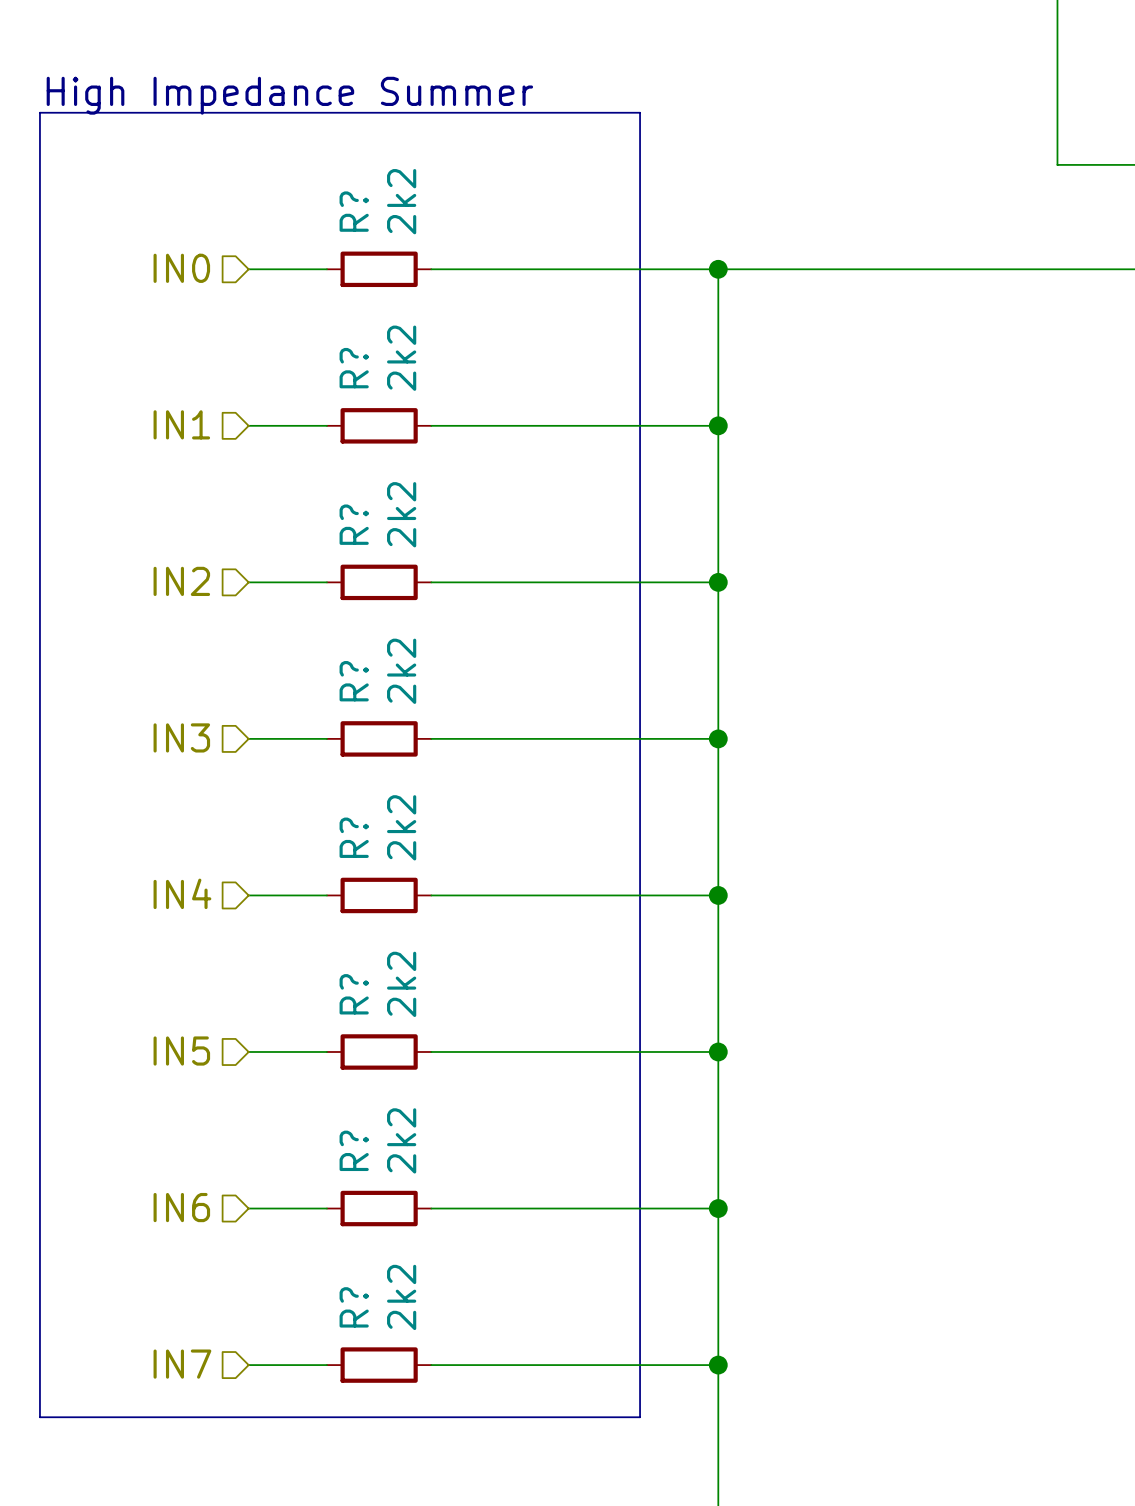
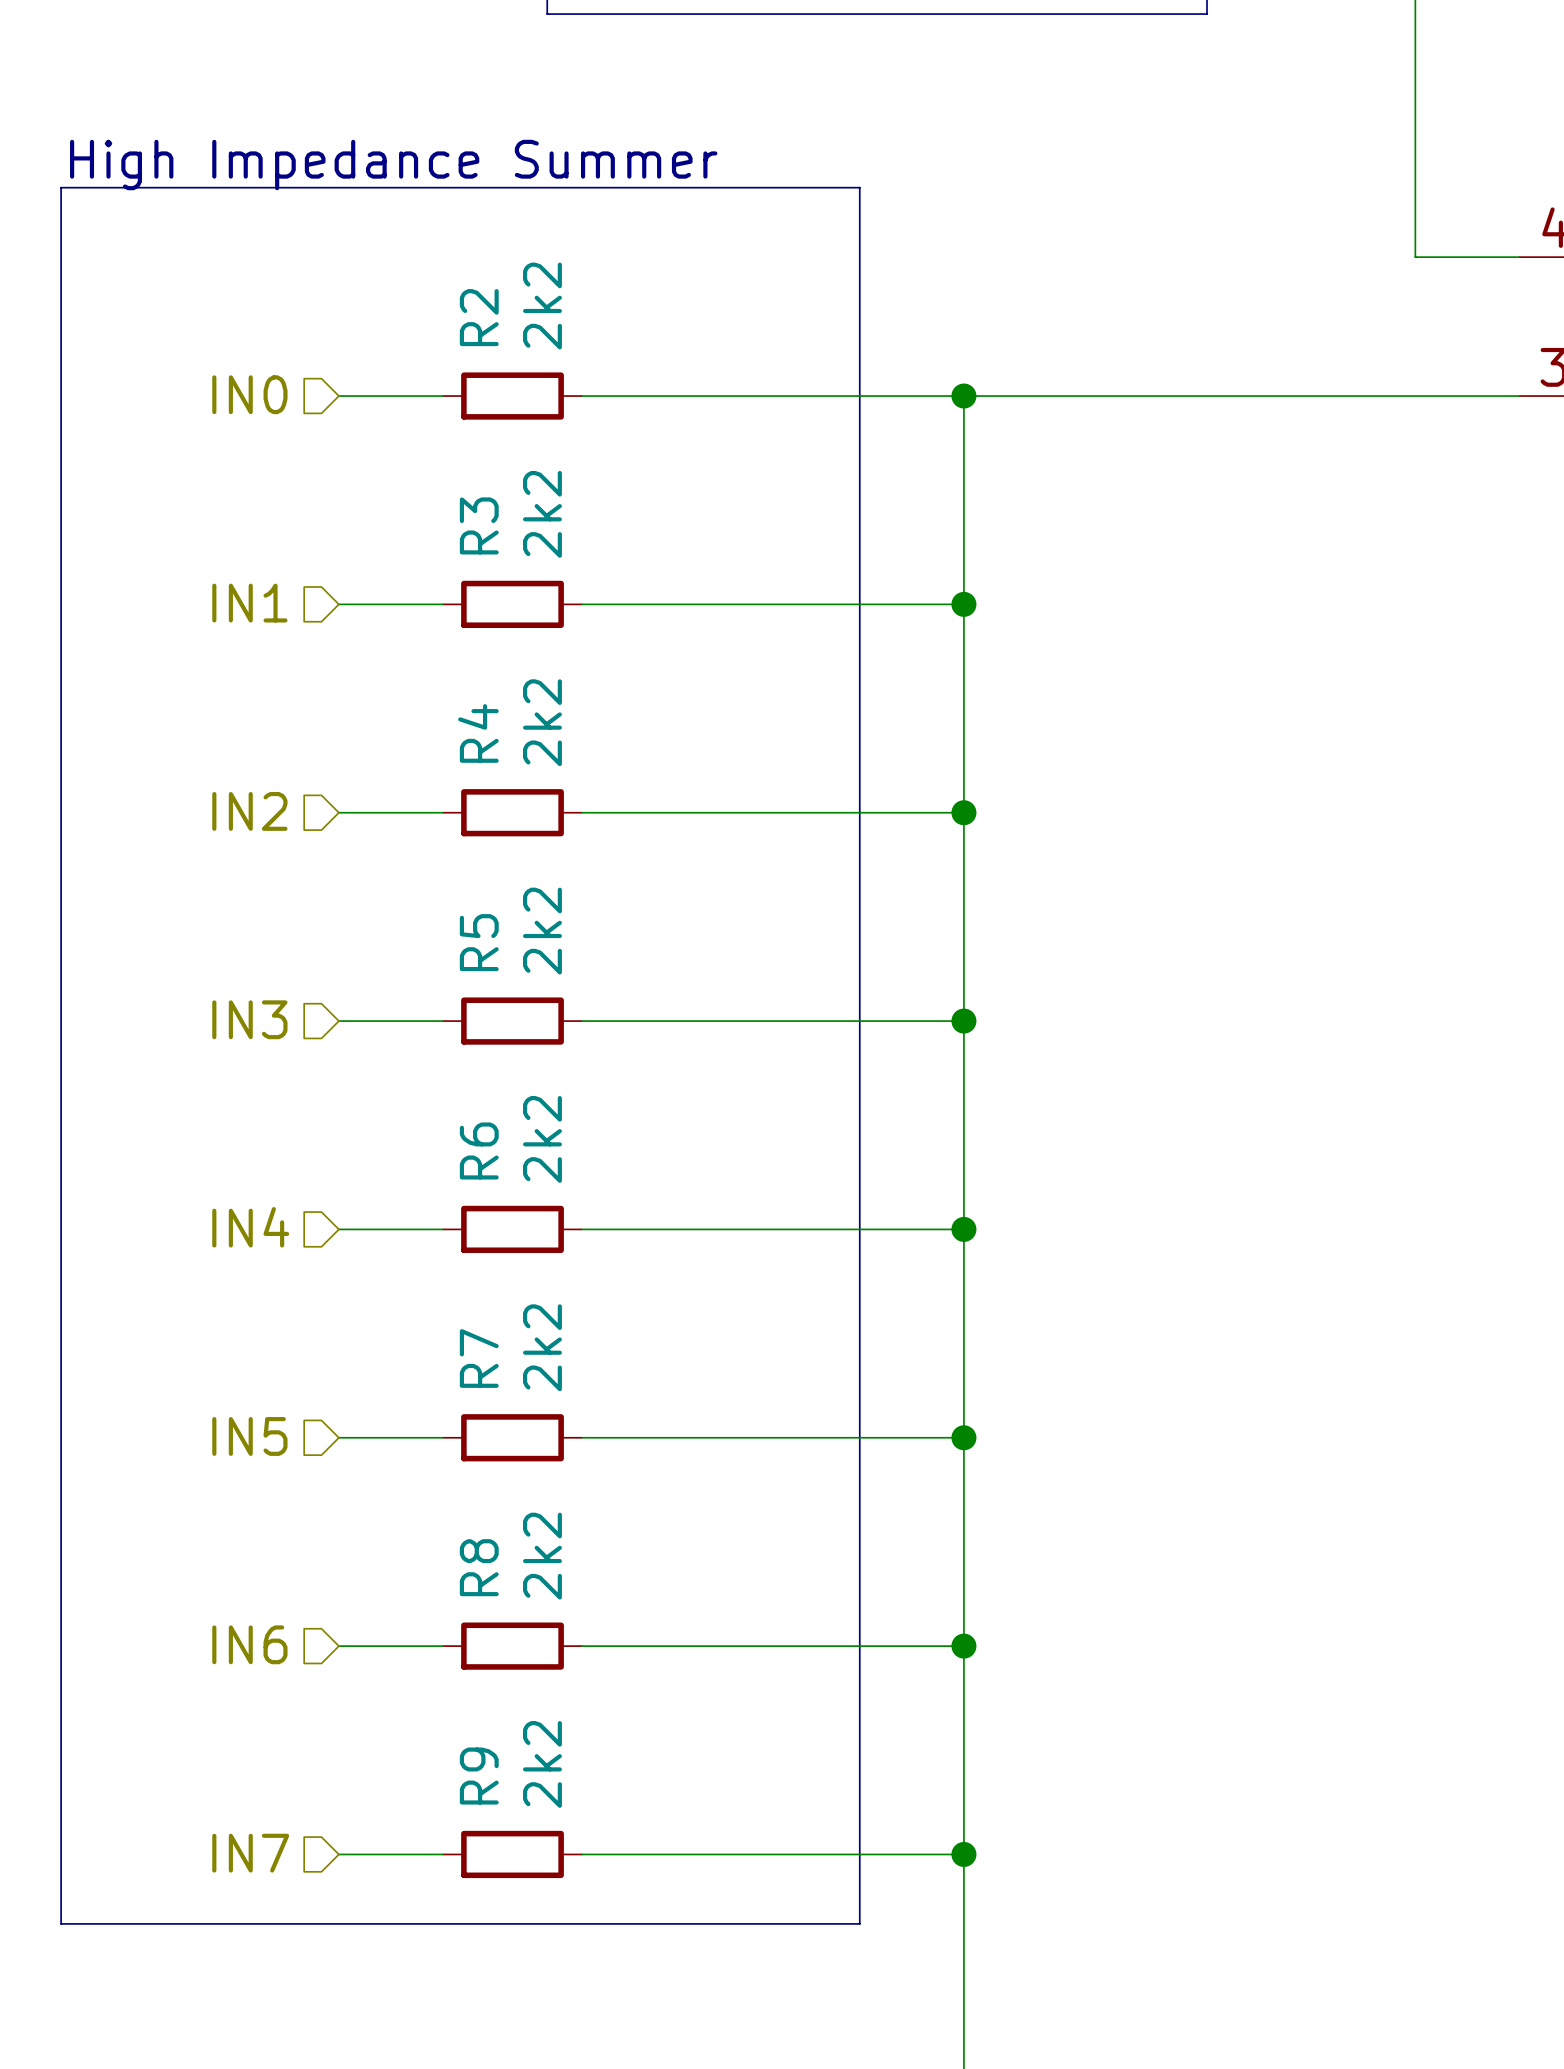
R? name: R? (354, 211) -> R2 (479, 317)
R? name: R? (354, 368) -> R3 (479, 525)
R? name: R? (354, 524) -> R4 (478, 733)
R? name: R? (354, 681) -> R5 (479, 942)
R? name: R? (354, 837) -> R6 (479, 1150)
R? name: R? (354, 994) -> R7 (479, 1358)
R? name: R? (354, 1150) -> R8 (479, 1567)
R? name: R? (354, 1307) -> R9 (479, 1776)

